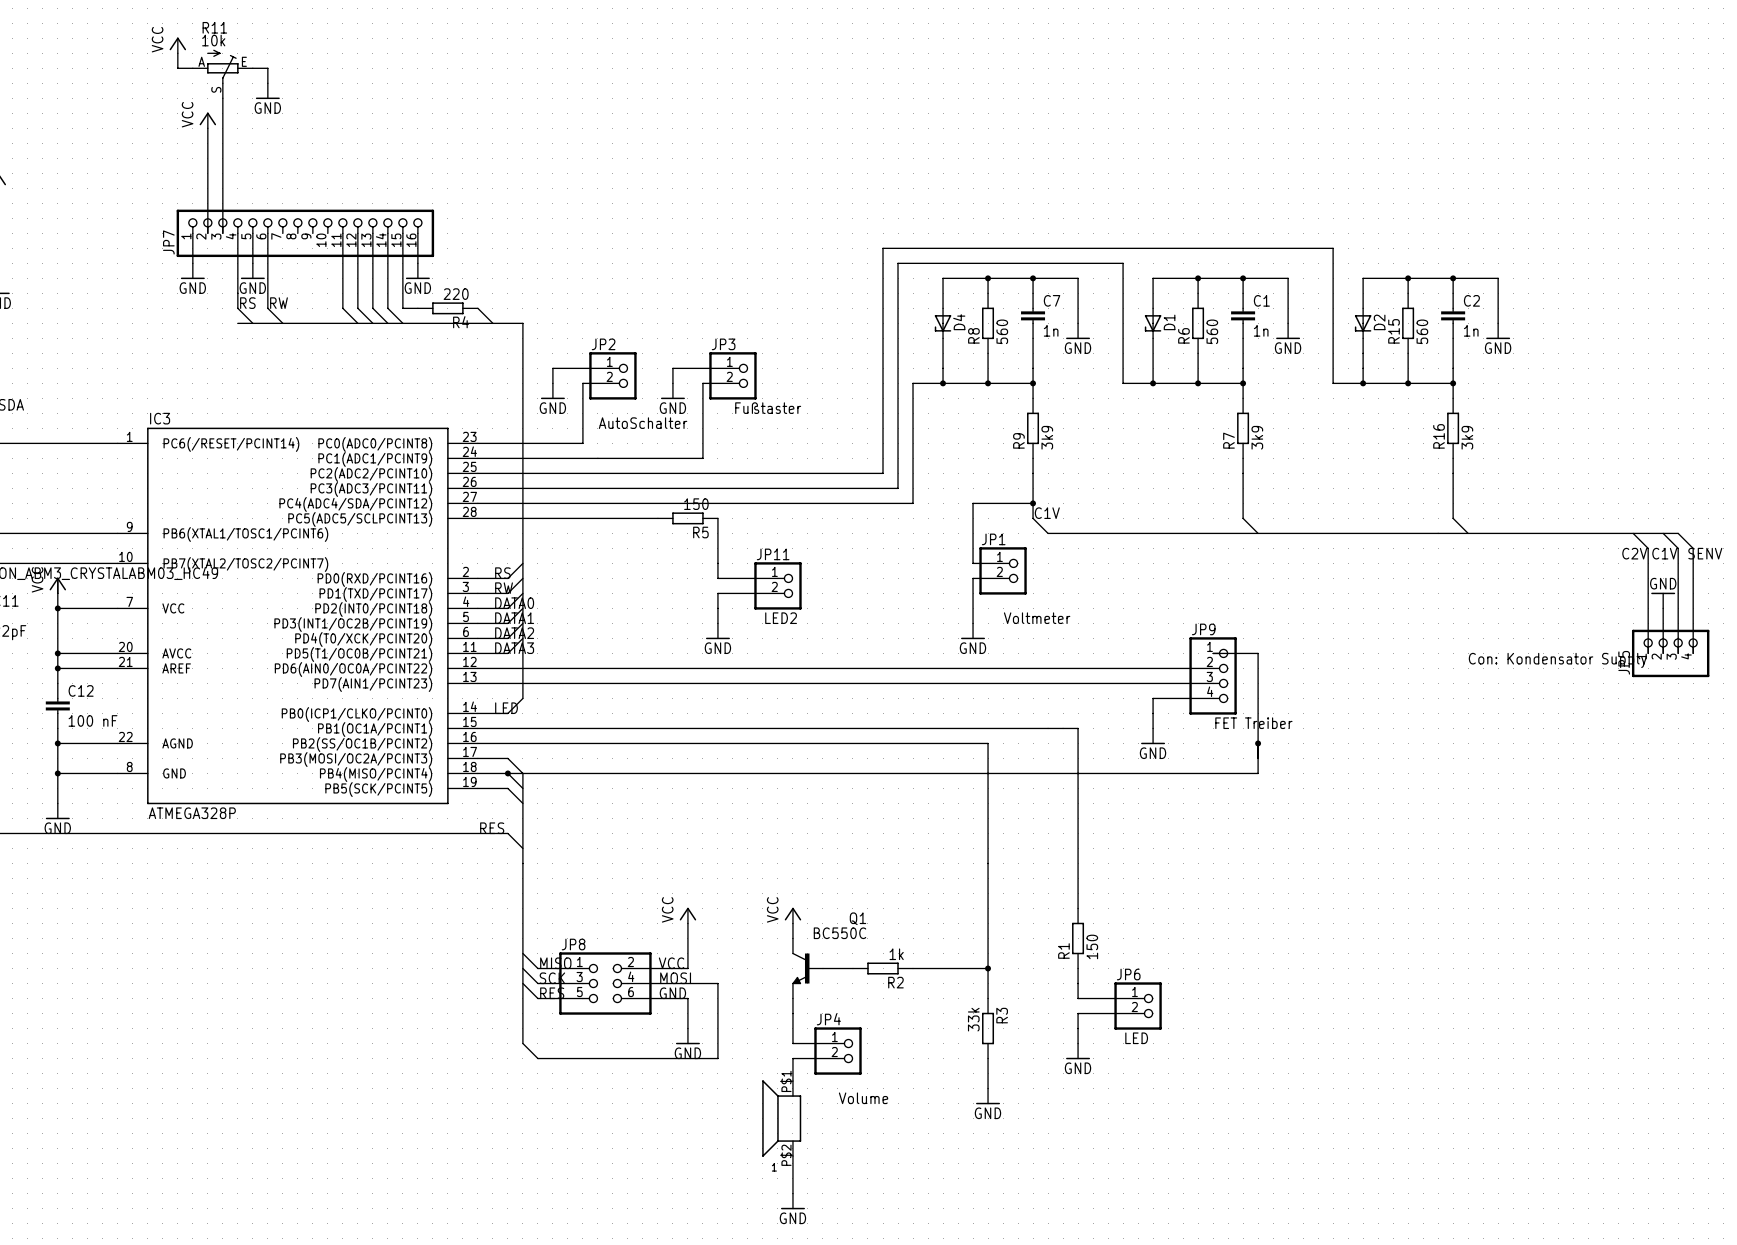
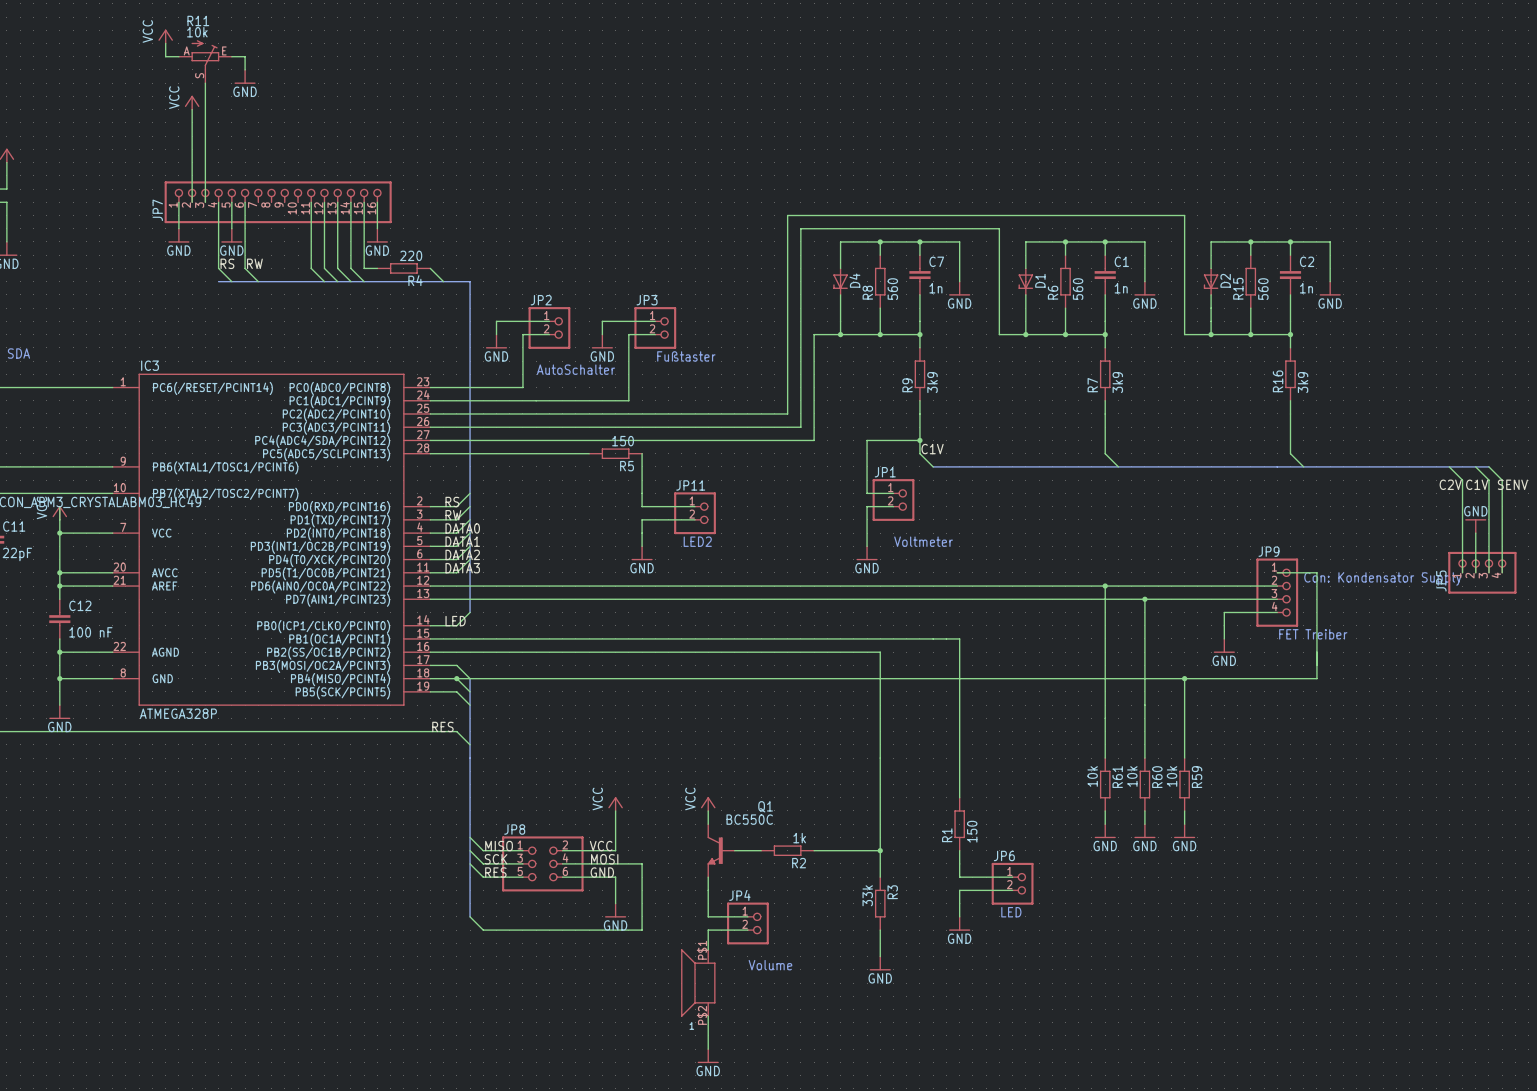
wire: (1213, 653) (1258, 653) (1258, 773) -> (1277, 572) (1316, 572) (1316, 678) (1118, 678)
wire: none -> (1078, 586) (1277, 586)
wire: none -> (1105, 586) (1105, 758)
junction: none -> (1105, 586)
JP9 position: (1213, 675) -> (1277, 592)
wire: none -> (1078, 599) (1277, 599)
wire: none -> (1144, 599) (1144, 758)
junction: none -> (1144, 599)
wire: (1213, 698) (1153, 698) (1153, 728) -> none
wire: none -> (1277, 612) (1224, 612) (1224, 638)
text: FET Treiber (1253, 723) -> none
text: none -> FET Treiber (1313, 634)
power symbol: GND (1153, 736) -> none
power symbol: none -> GND (1224, 645)
junction: (1258, 743) -> none
wire: none -> (1184, 678) (1184, 758)
junction: none -> (1184, 678)
R61: none -> 10k (1105, 784)
R60: none -> 10k (1144, 784)
R59: none -> 10k (1184, 784)
wire: none -> (1105, 810) (1105, 824)
wire: none -> (1144, 810) (1144, 824)
wire: none -> (1184, 810) (1184, 824)
power symbol: none -> GND (1105, 831)
power symbol: none -> GND (1144, 831)
power symbol: none -> GND (1184, 831)

